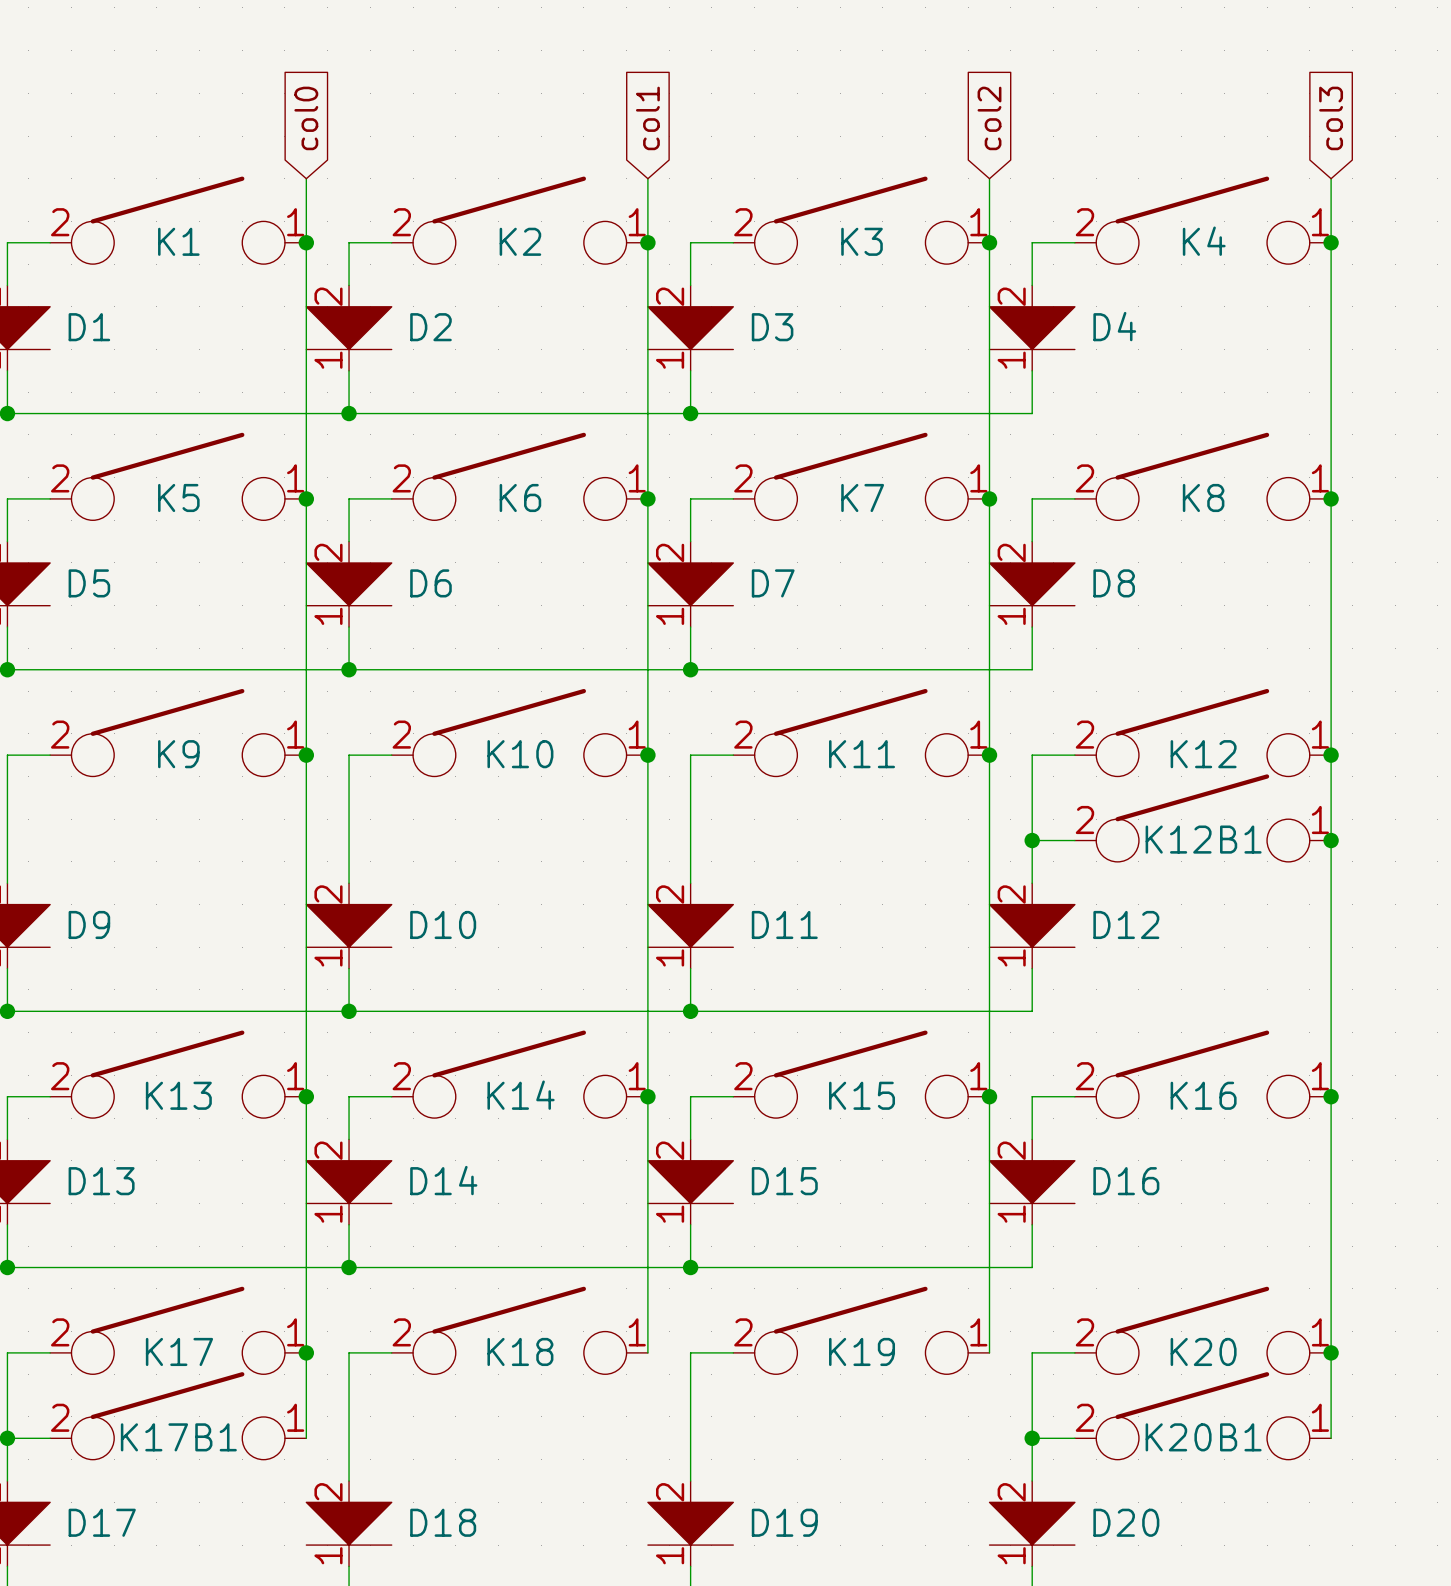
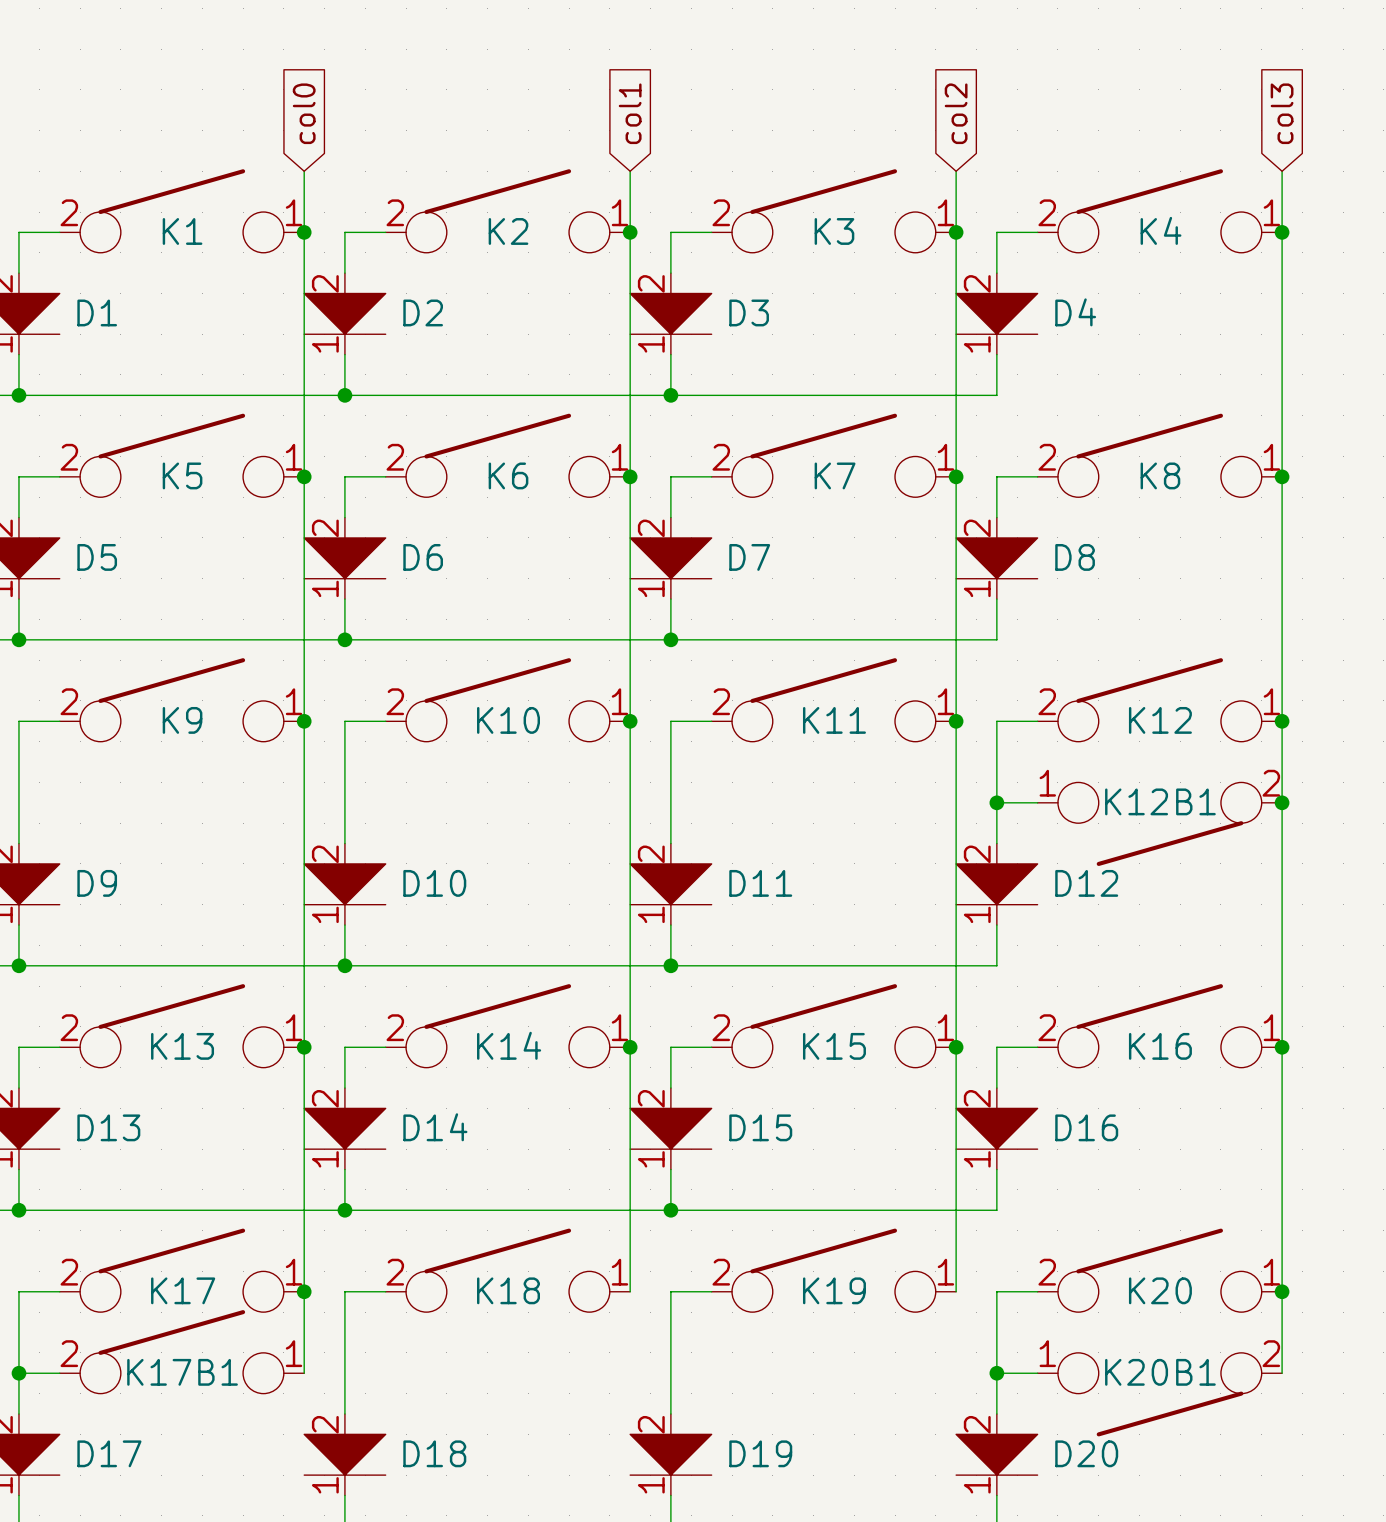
K12B1 rotation: 0° (1202, 818) -> 180° (1159, 824)
K20B1 rotation: 0° (1202, 1415) -> 180° (1159, 1394)

